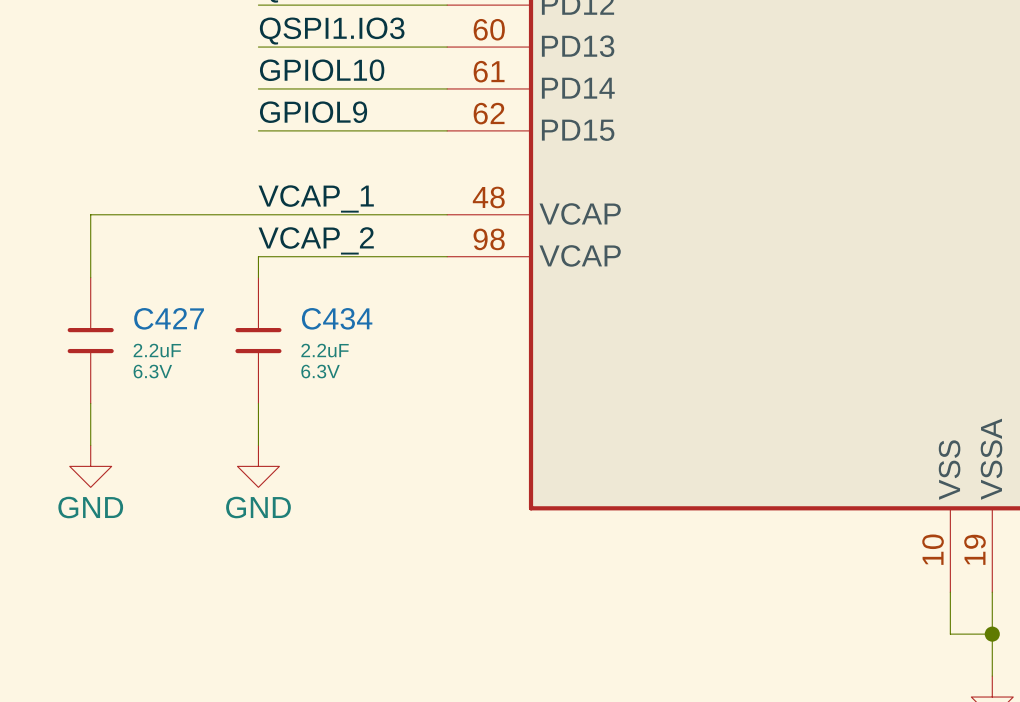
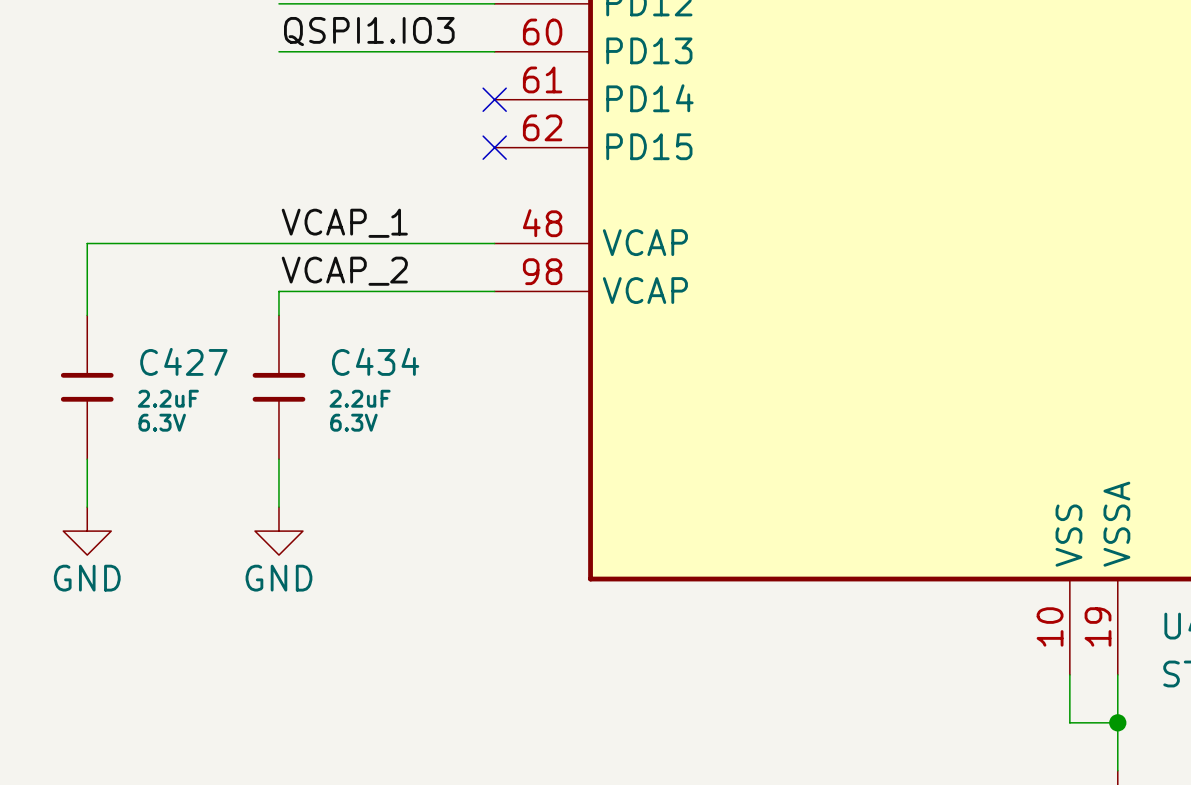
label: GPIOL10 (322, 70) -> none
wire: (258, 88) (447, 88) -> none
no-connect mark: none -> (494, 99)
label: GPIOL9 (313, 112) -> none
wire: (258, 130) (447, 130) -> none
no-connect mark: none -> (494, 147)

